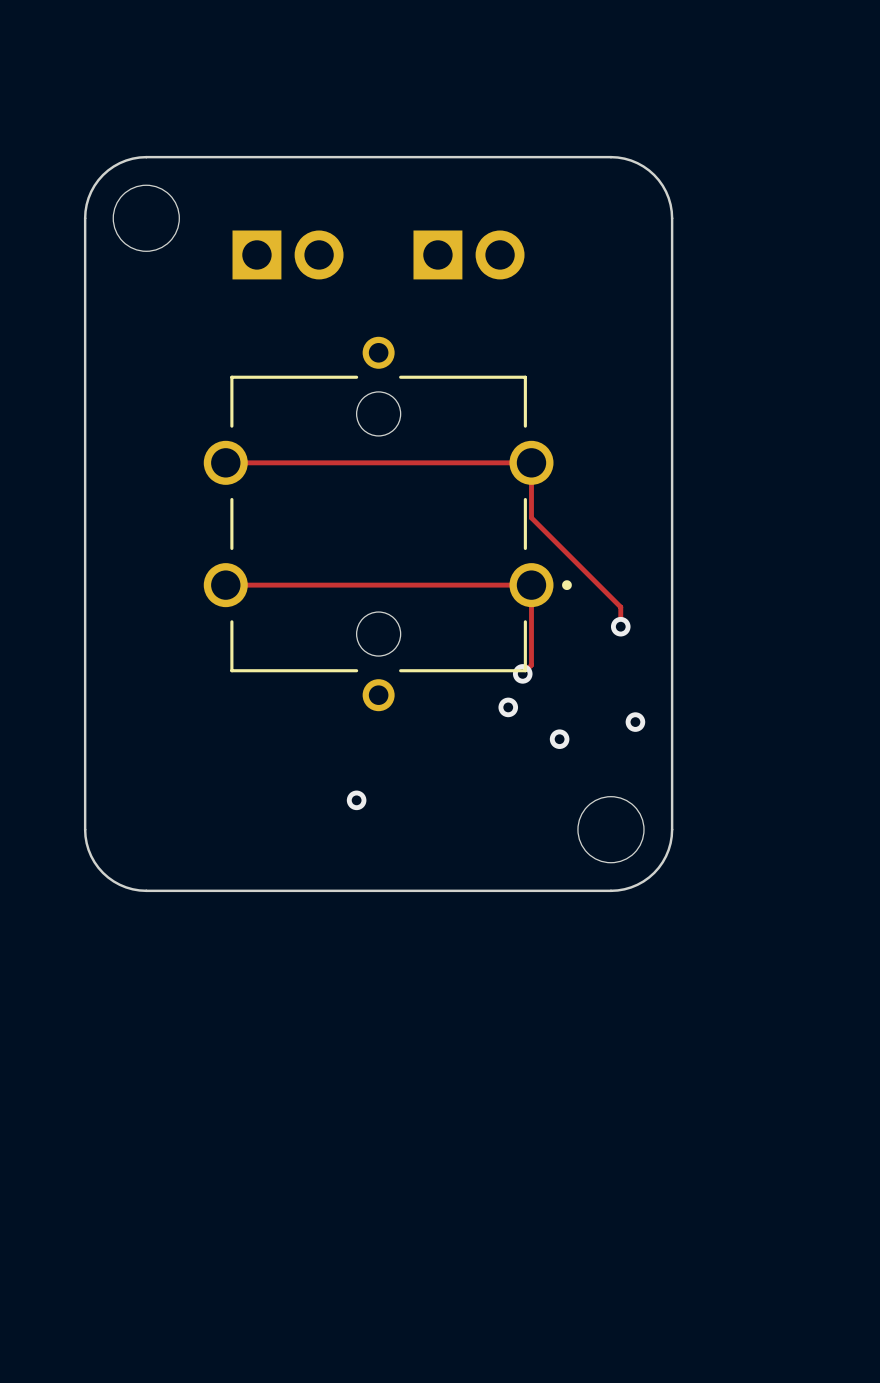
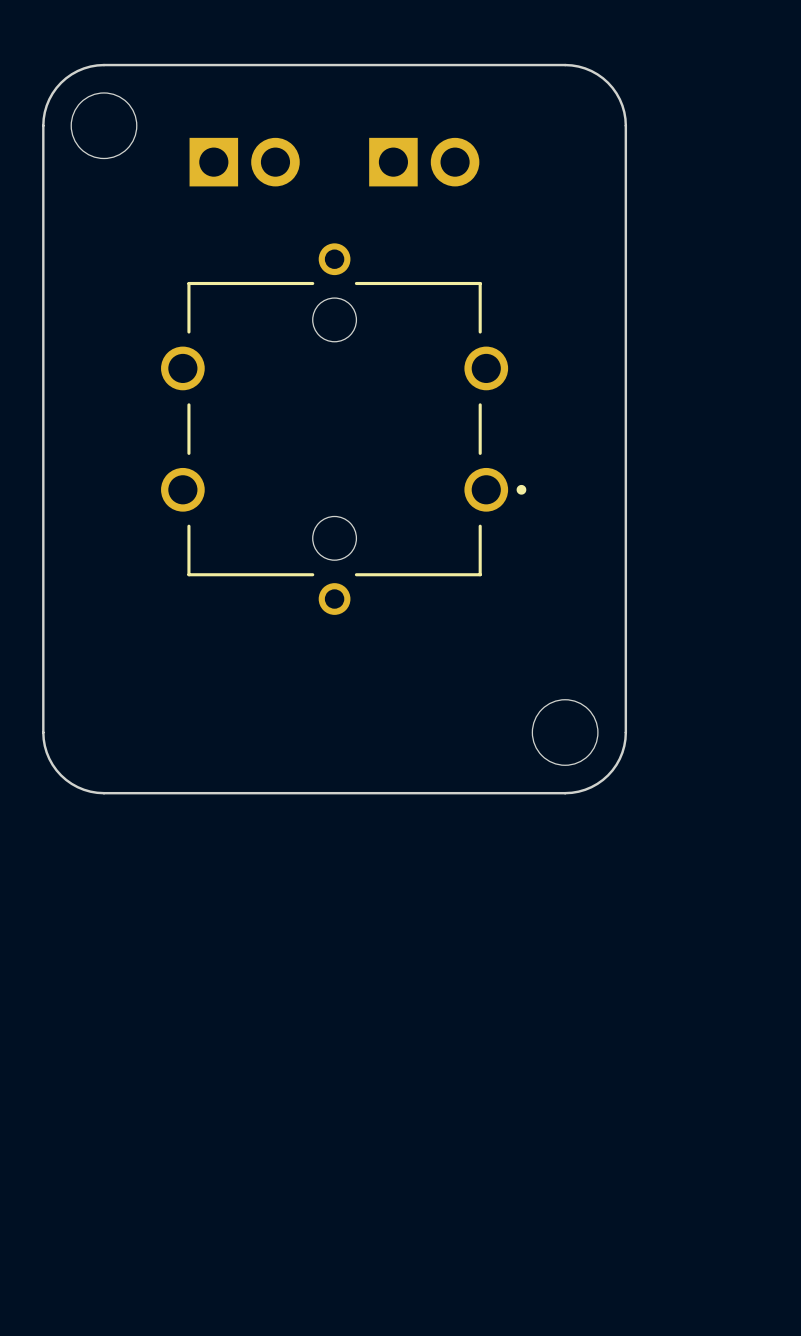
track: (225, 462) (531, 462) (531, 517) (620, 607) (620, 626) -> none
track: (225, 585) (531, 585) (531, 665) (522, 673) -> none
via: (620, 626) -> none
via: (522, 673) -> none
via: (508, 707) -> none
via: (635, 722) -> none
via: (559, 739) -> none
via: (356, 800) -> none

